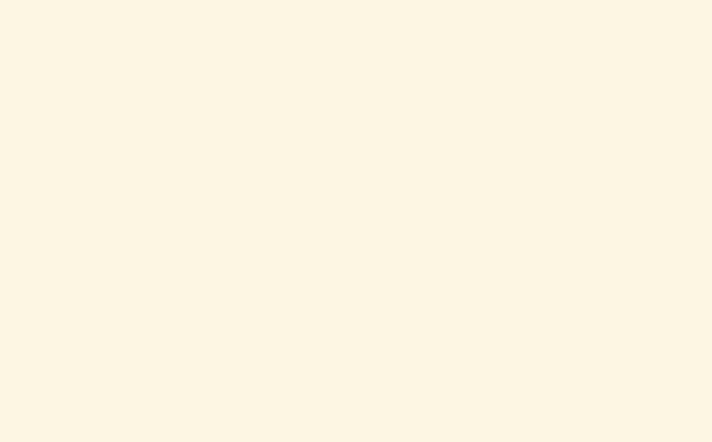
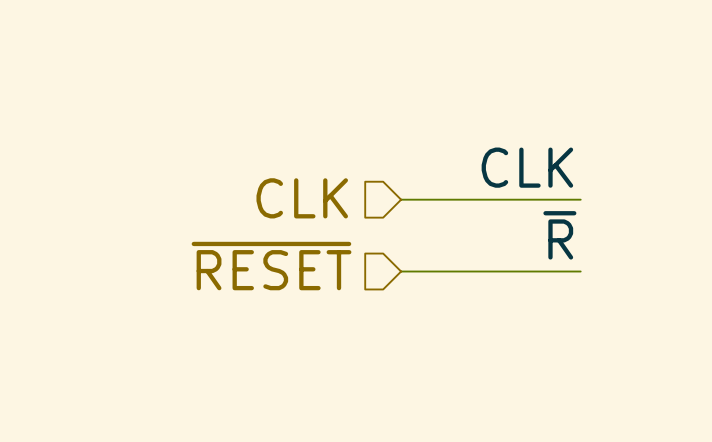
label: none -> CLK (527, 167)
hierarchical label: none -> CLK (302, 198)
wire: none -> (401, 199) (580, 199)
label: none -> ~{R} (559, 235)
hierarchical label: none -> ~{RESET} (271, 266)
wire: none -> (401, 271) (580, 271)

